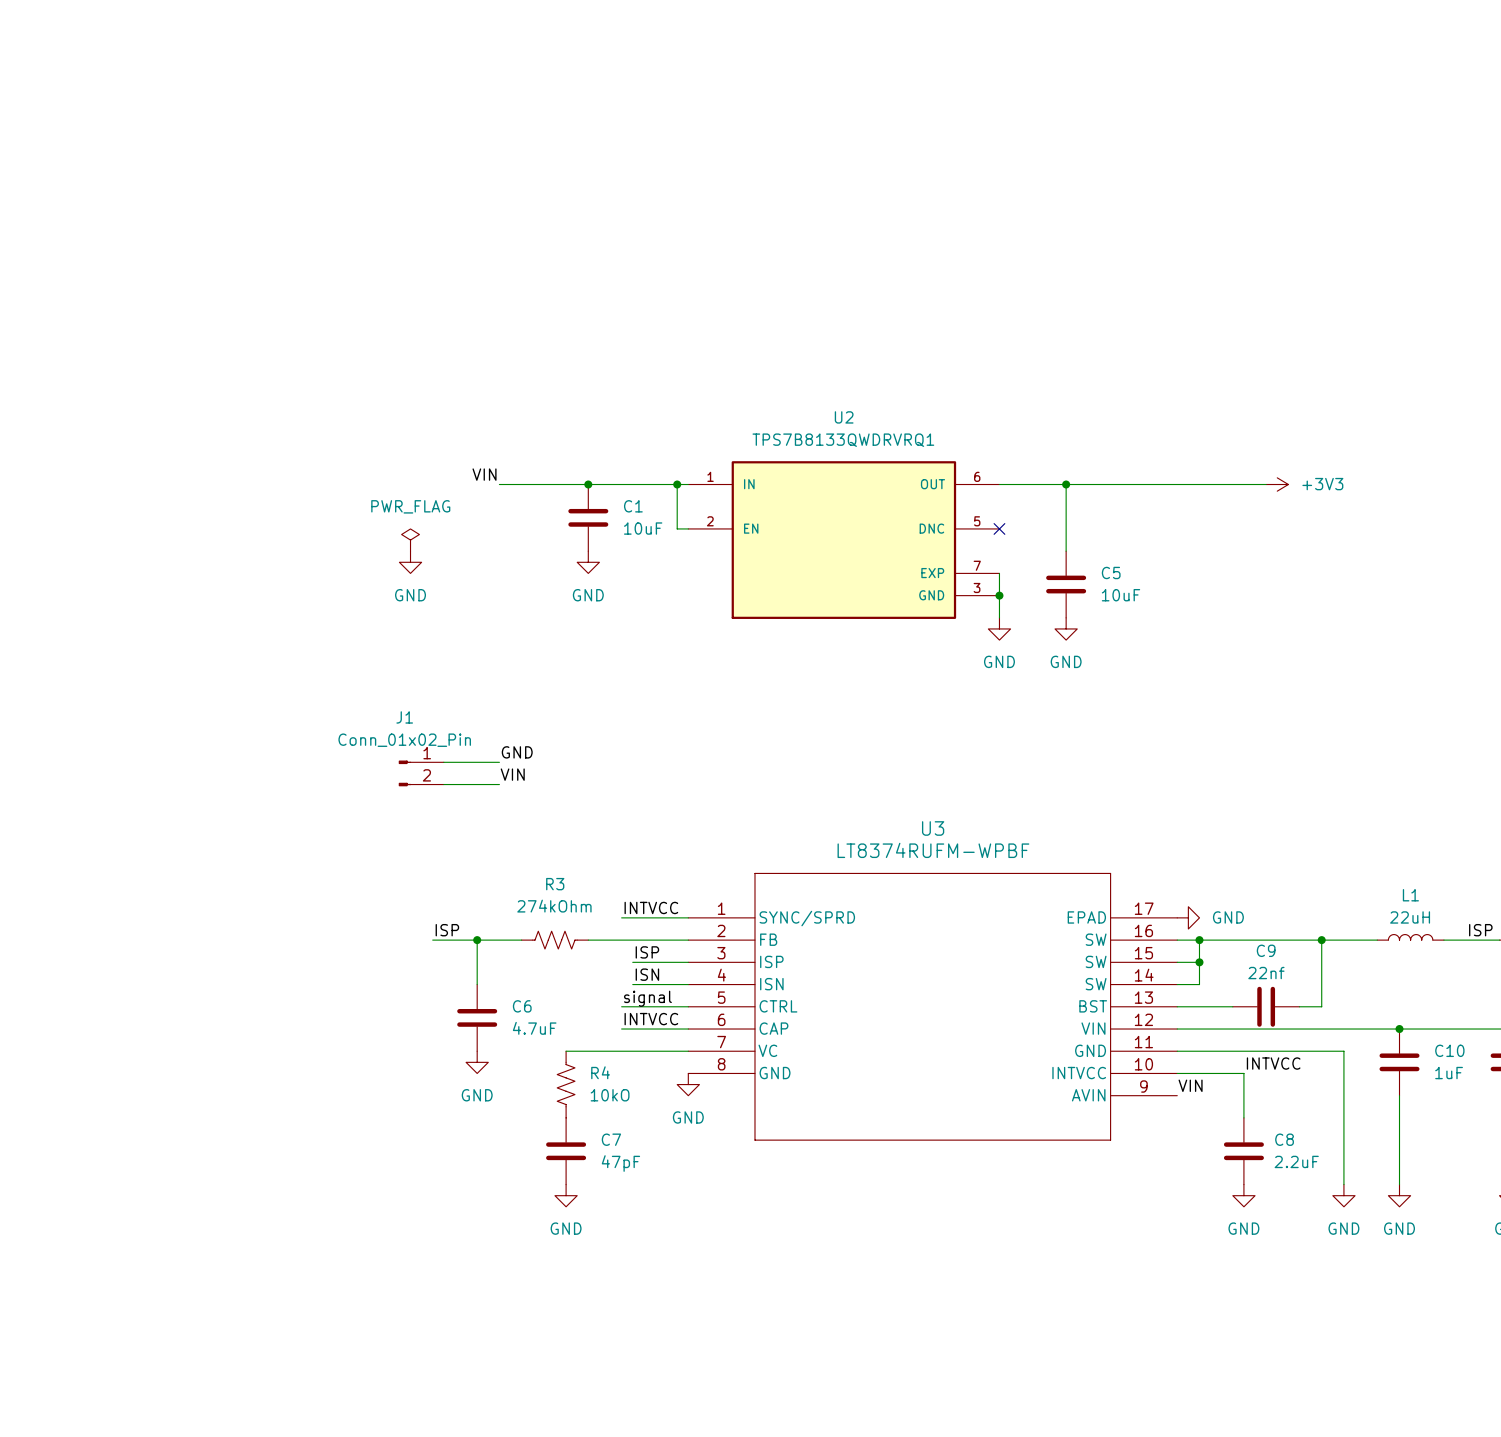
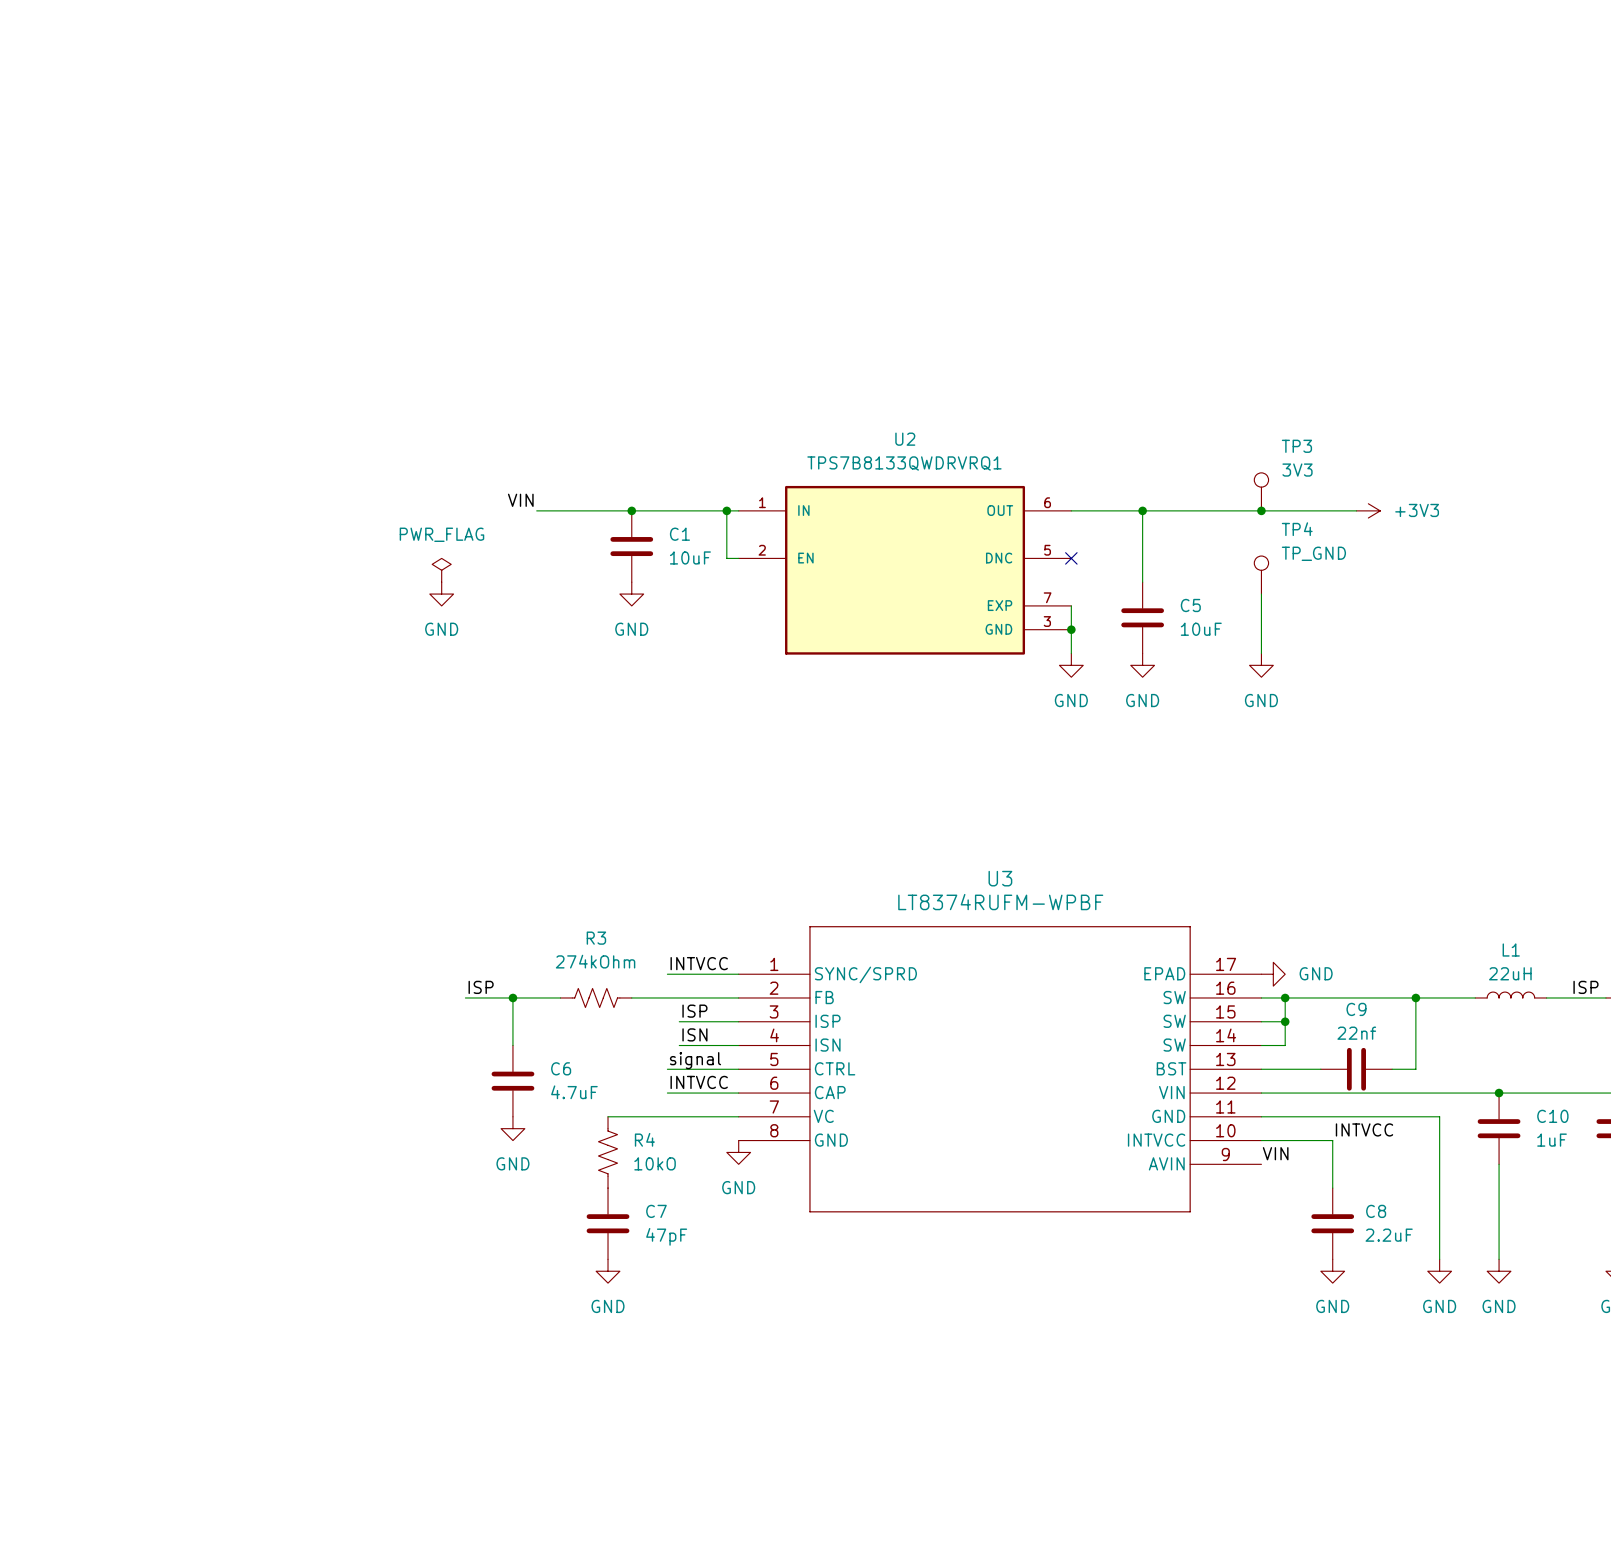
TP3: none -> 3V3 (1261, 491)
junction: none -> (1261, 510)
TP4: none -> TP_GND (1261, 575)
wire: none -> (1261, 594) (1261, 653)
power symbol: none -> GND (1261, 665)
label: GND (517, 752) -> none
wire: (443, 762) (499, 762) -> none
J1: Conn_01x02_Pin (421, 773) -> none
label: VIN (512, 774) -> none
wire: (443, 784) (499, 784) -> none

